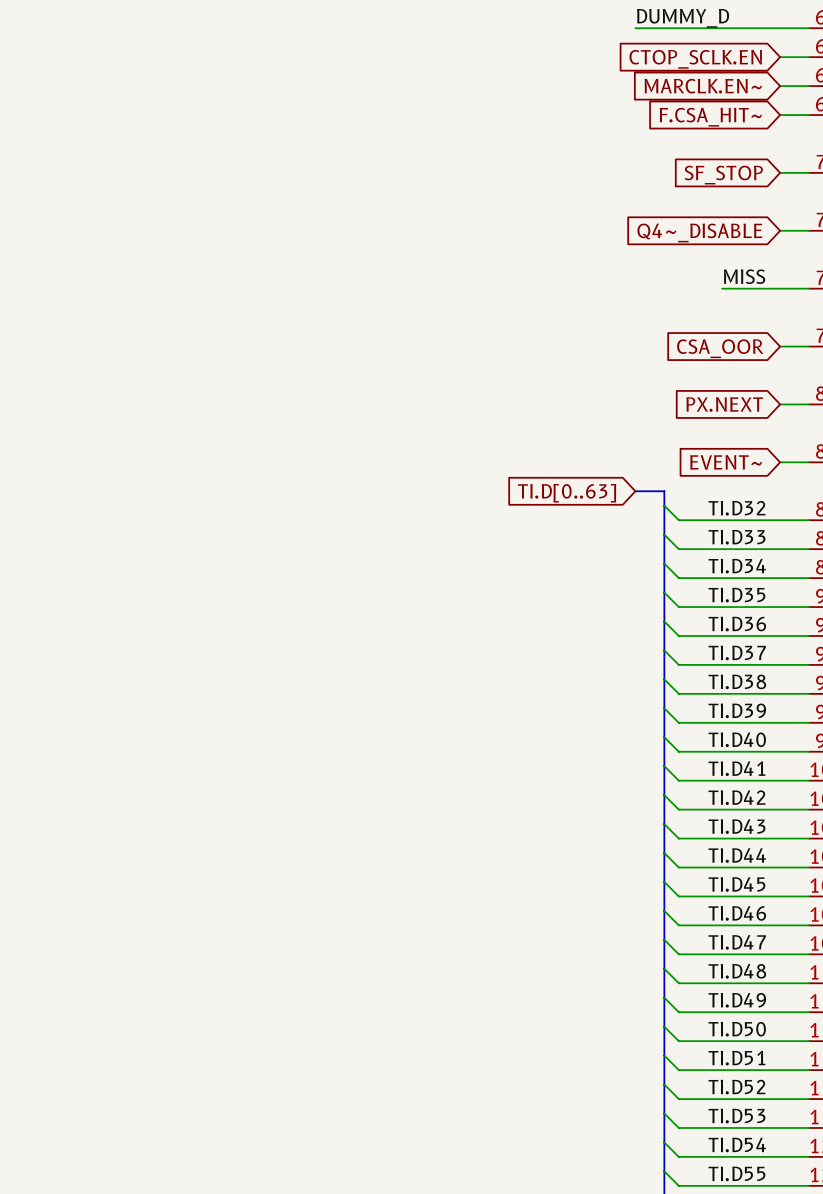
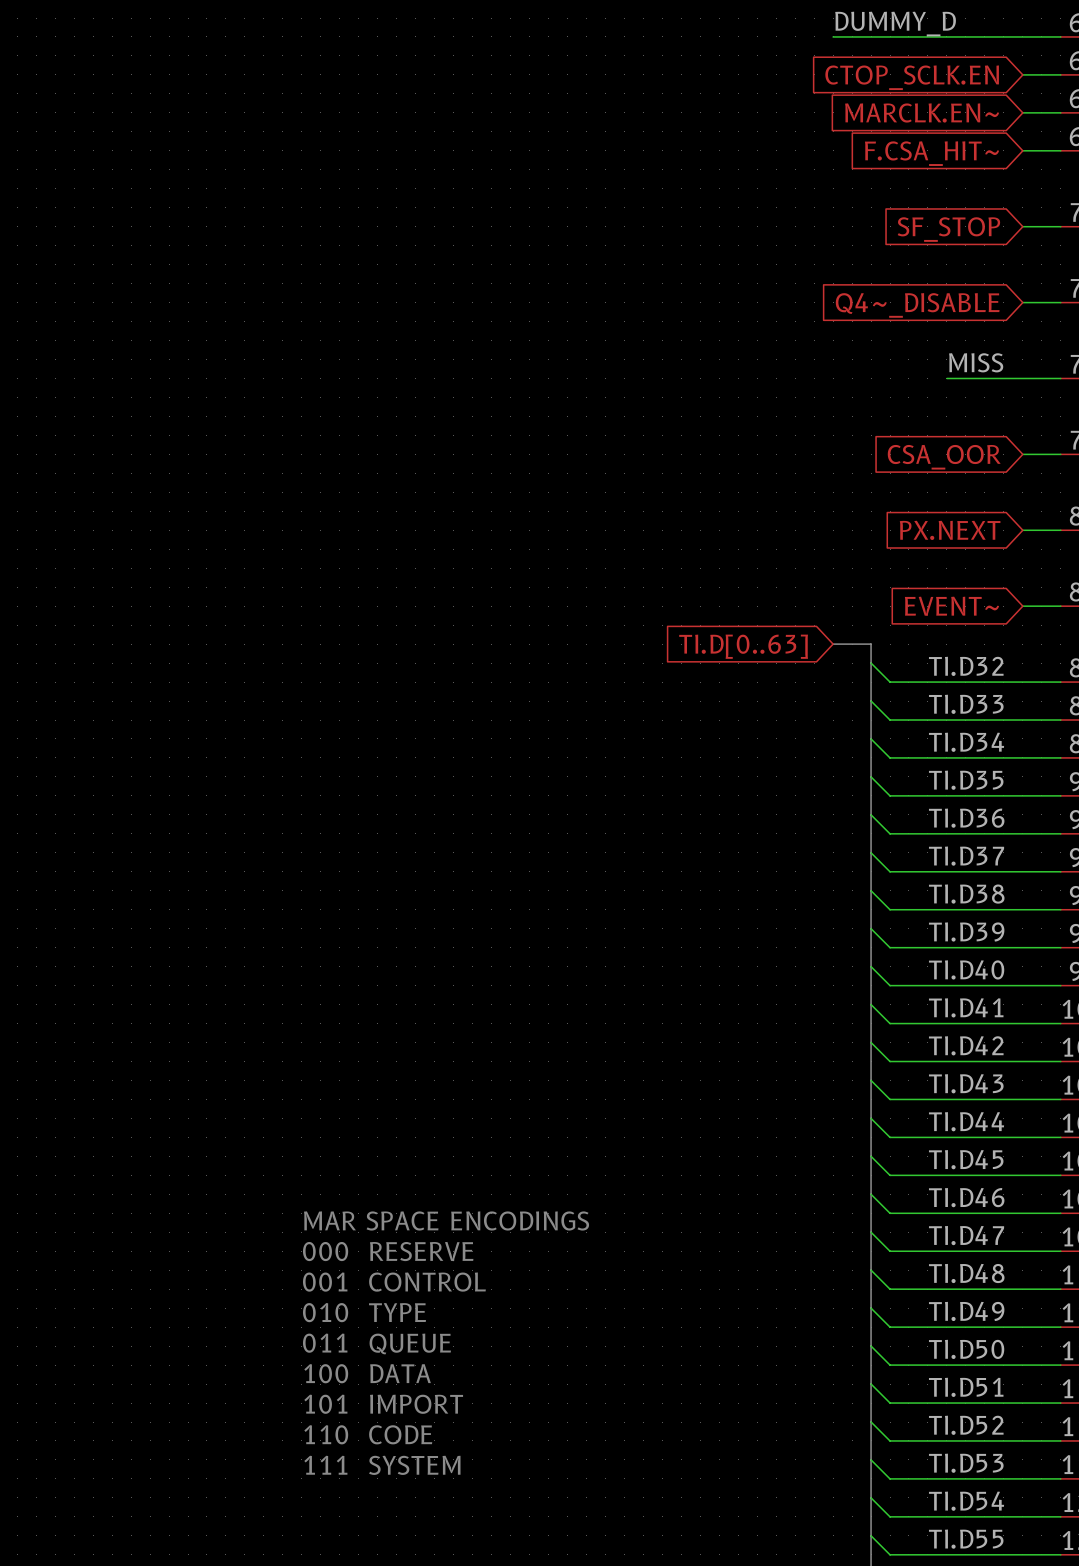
text: none -> MAR SPACE ENCODINGS (446, 1220)
text: none -> 000 RESERVE (388, 1251)
text: none -> 001 CONTROL (394, 1282)
text: none -> 010 TYPE (364, 1312)
text: none -> 011 QUEUE (376, 1343)
text: none -> 100 DATA (367, 1373)
text: none -> 101 IMPORT (383, 1404)
text: none -> 110 CODE (368, 1434)
text: none -> 111 SYSTEM (382, 1465)

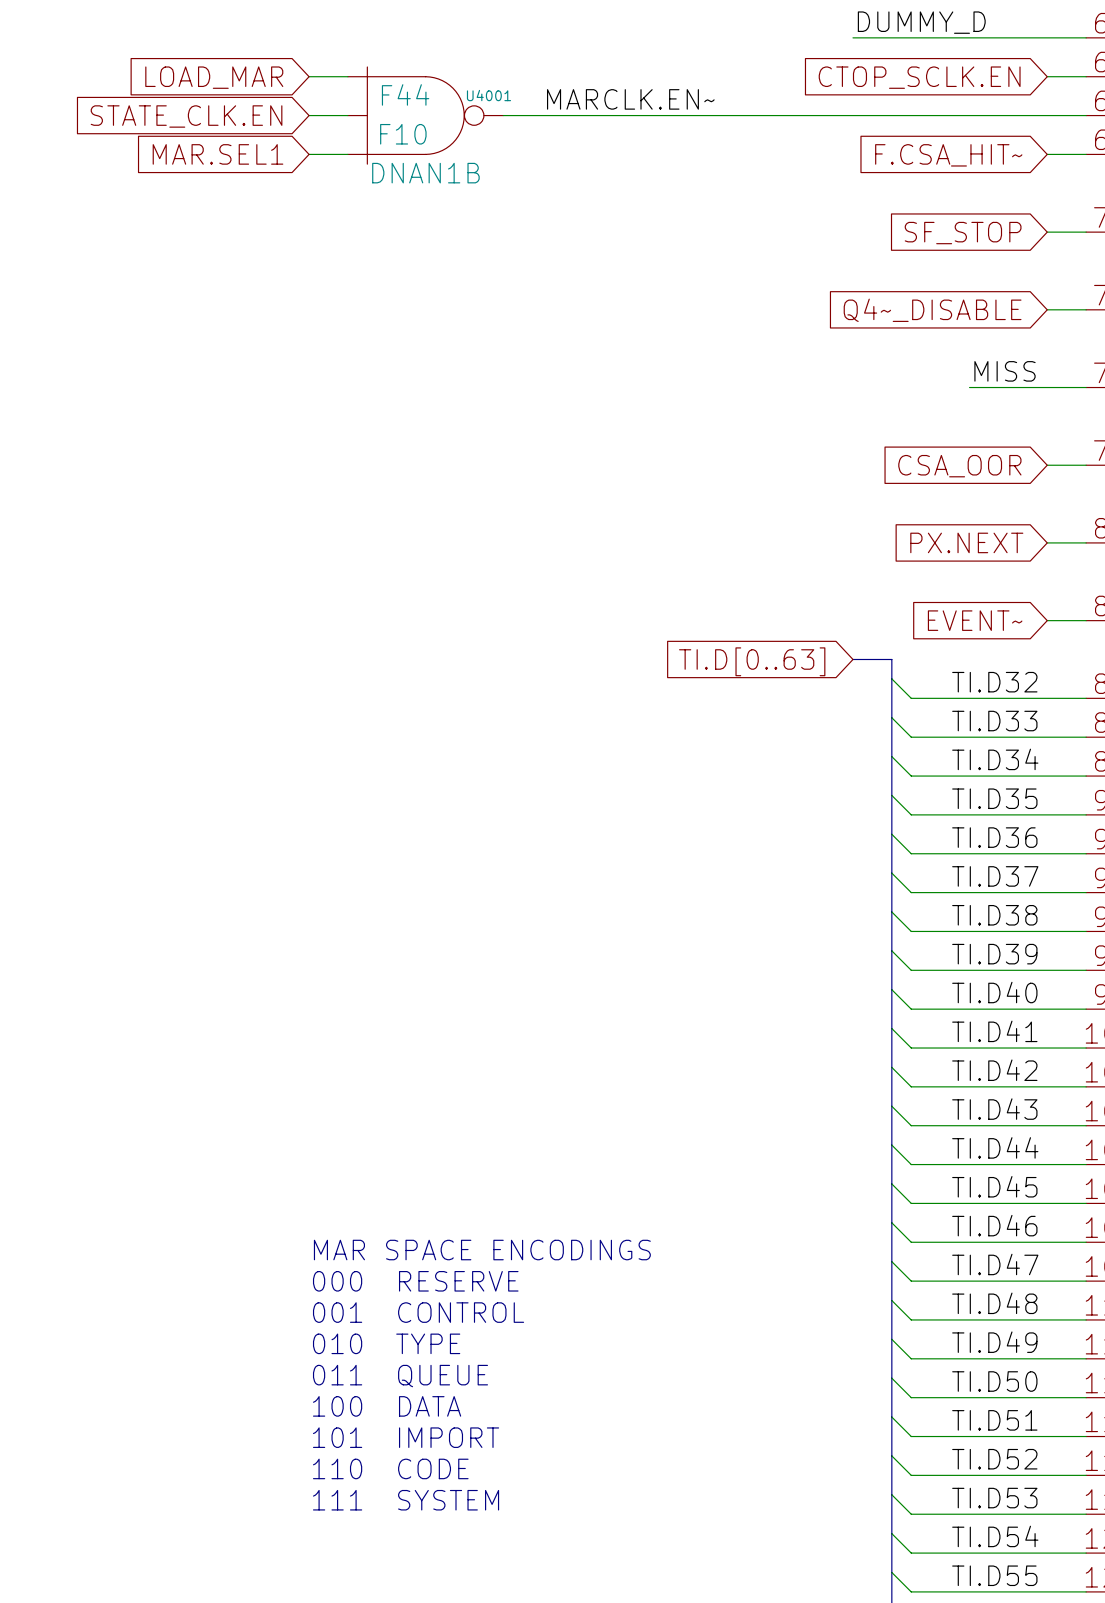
wire: none -> (309, 76) (347, 76)
global label: none -> LOAD_MAR (214, 77)
label: none -> MARCLK.EN~ (630, 99)
wire: none -> (309, 115) (347, 115)
U4001: none -> F10 (425, 115)
wire: none -> (503, 115) (1047, 115)
global label: MARCLK.EN~ (922, 112) -> none
global label: none -> STATE_CLK.EN (186, 116)
global label: none -> MAR.SEL1 (217, 154)
wire: none -> (309, 154) (347, 154)

